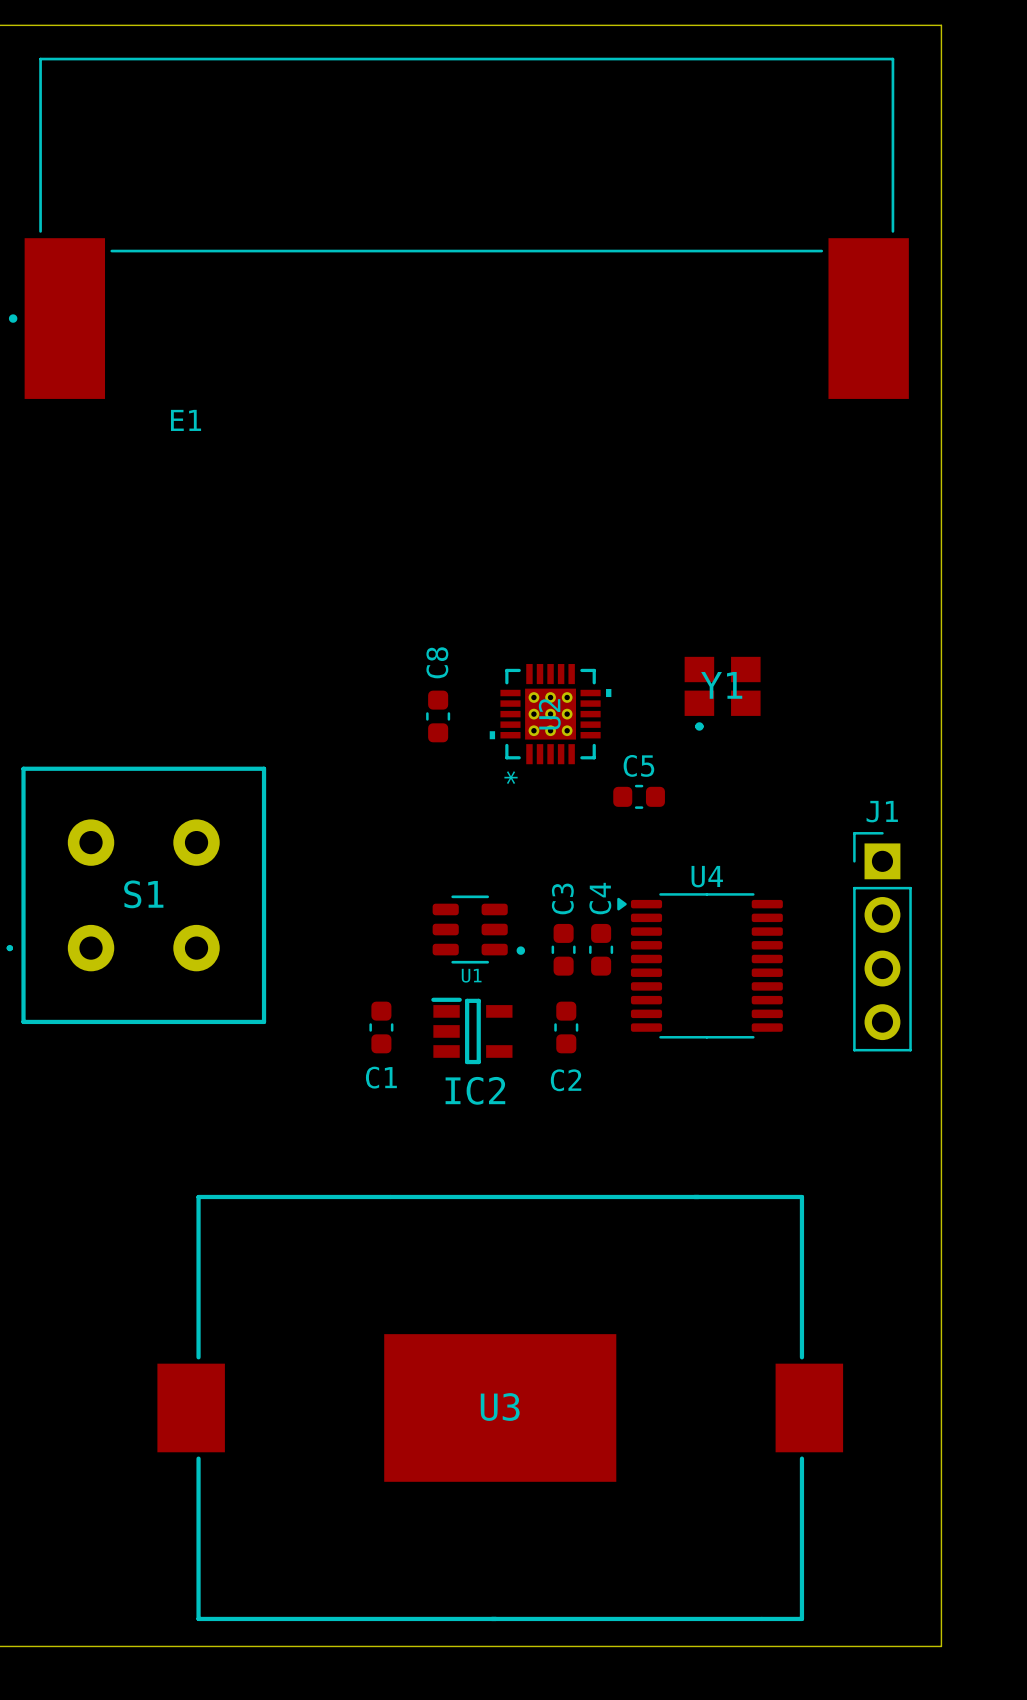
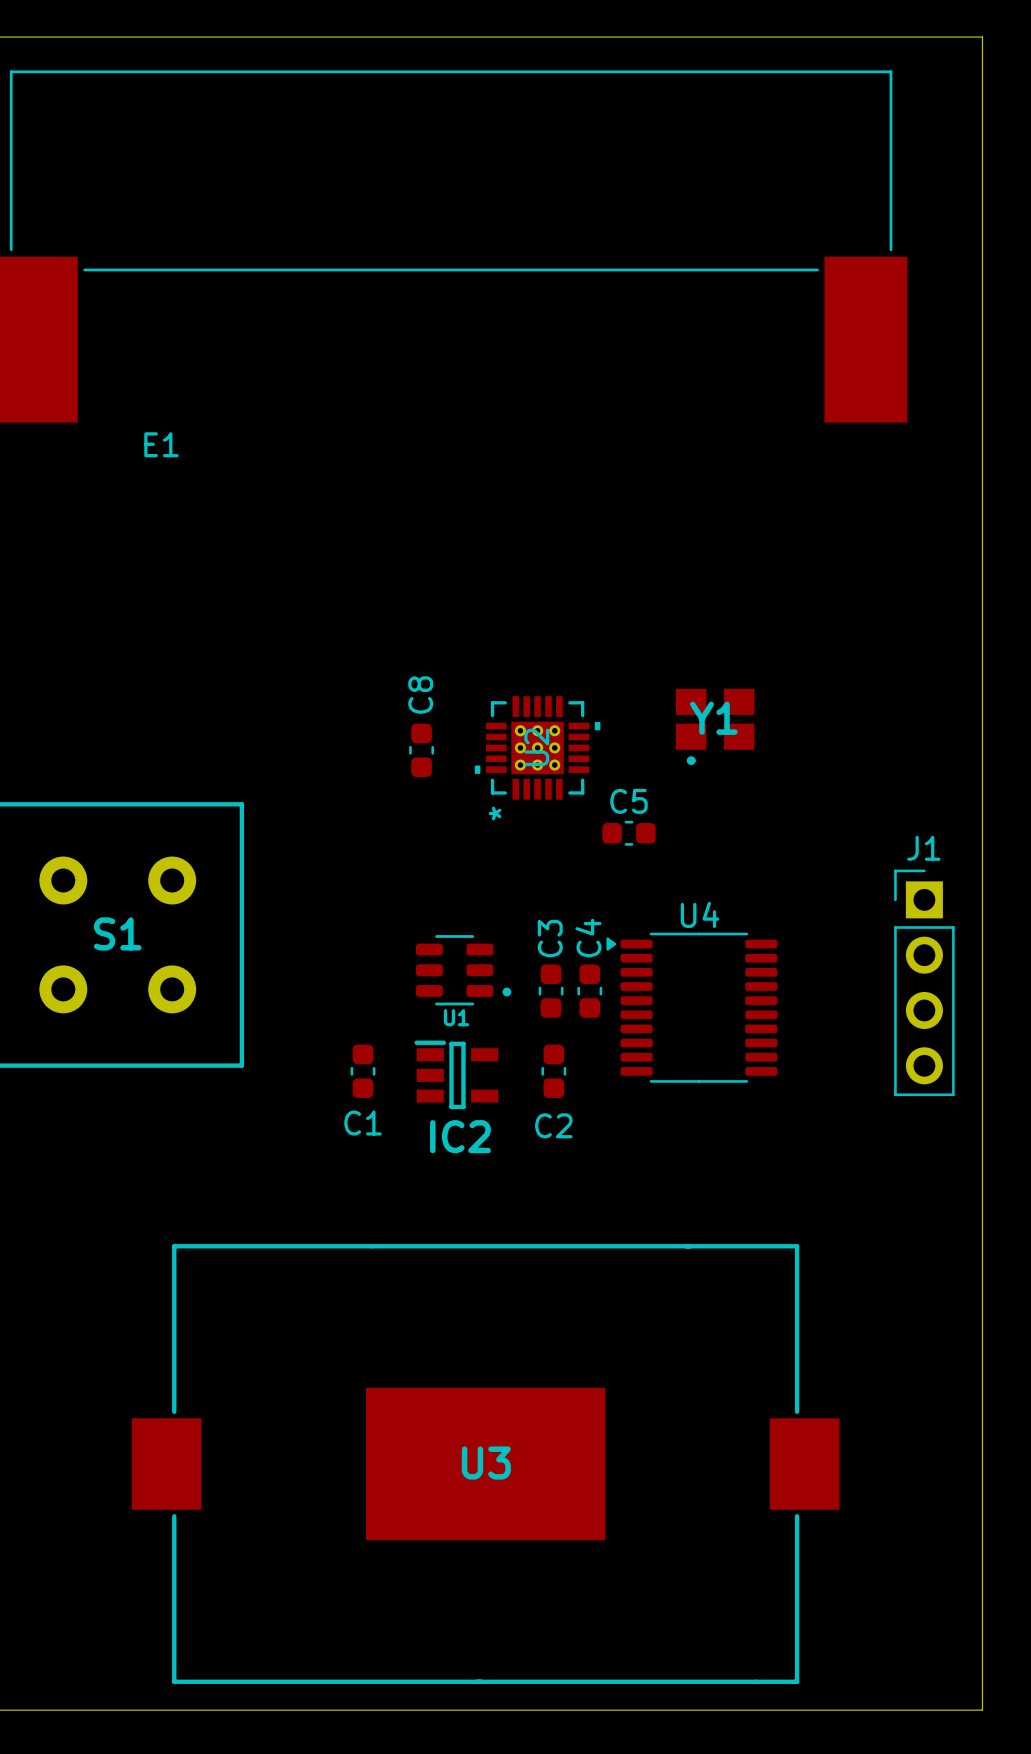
board edge: (941, 25) (941, 1646) -> (941, 37) (982, 37) (982, 1710) (941, 1710)
J1 position: (882, 941) -> (924, 982)

